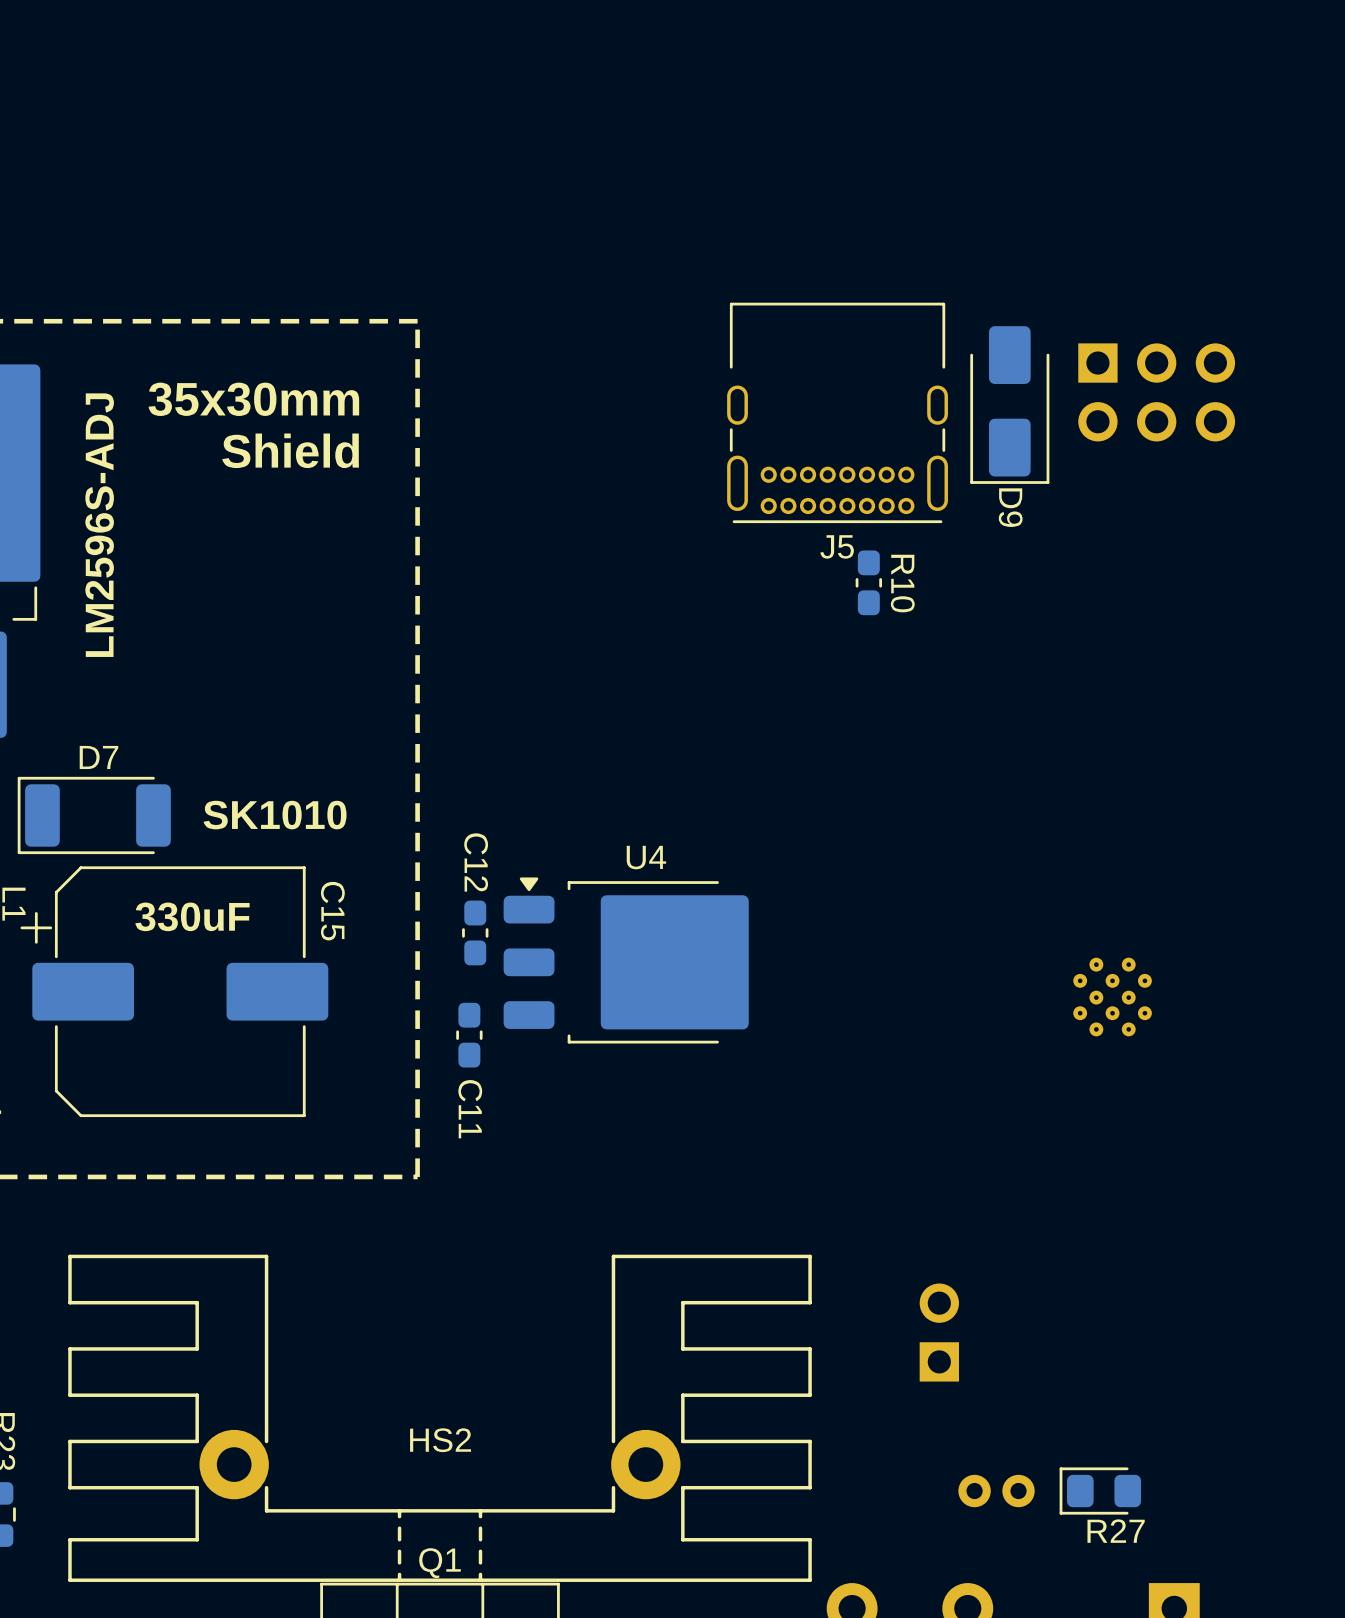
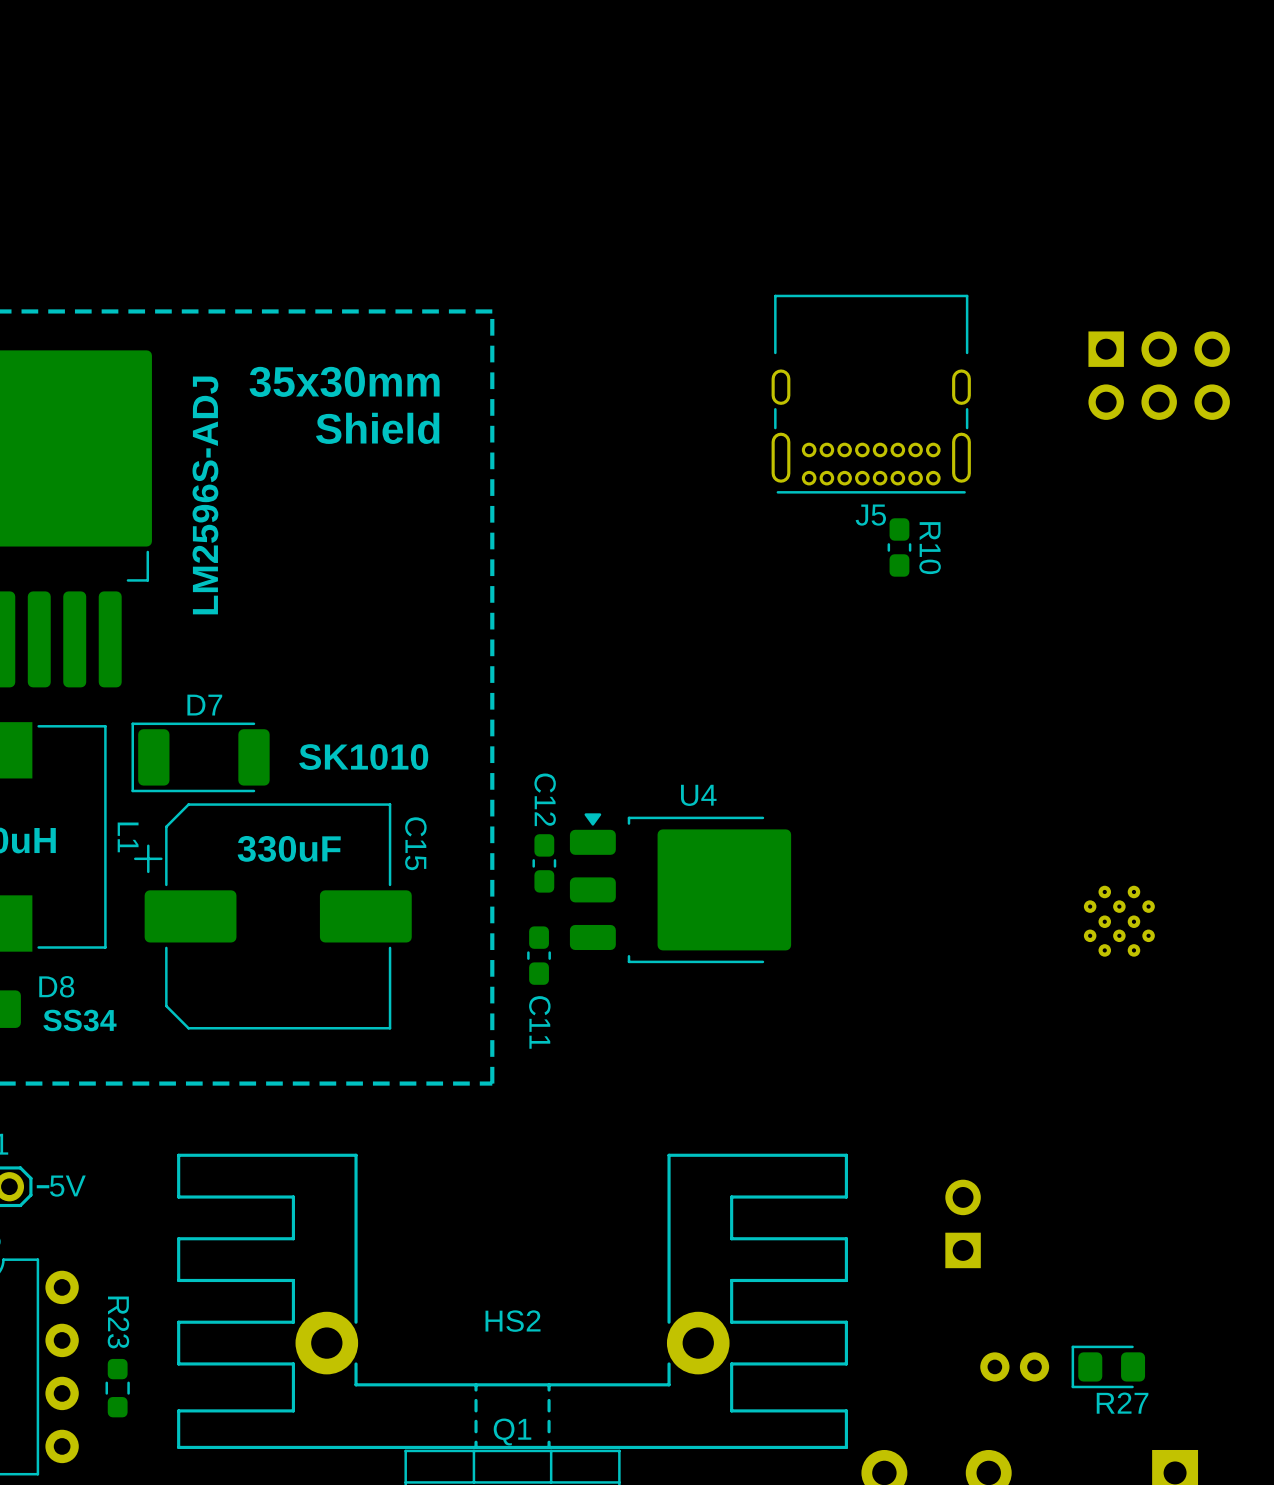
D9: (1009, 405) -> none

